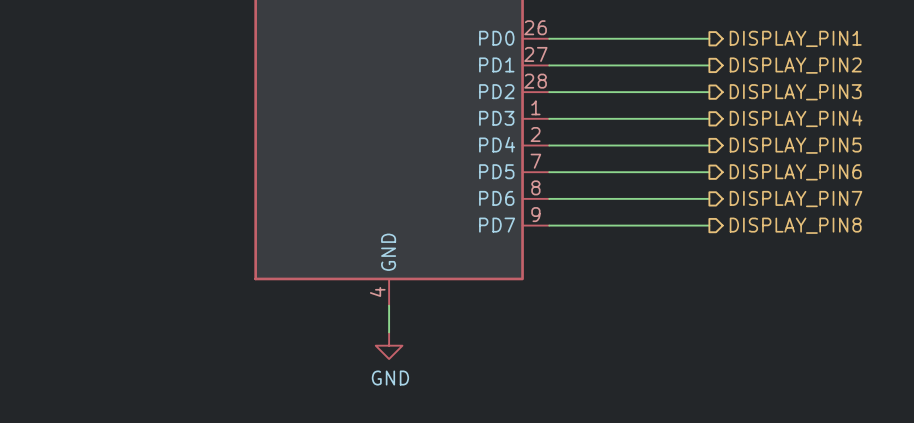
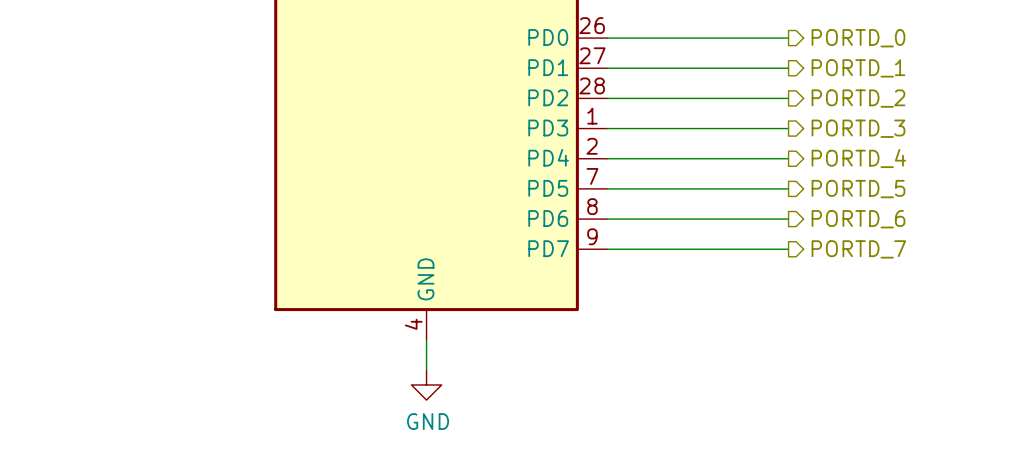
hierarchical label: DISPLAY_PIN1 (795, 38) -> PORTD_0 (858, 38)
hierarchical label: DISPLAY_PIN2 (795, 65) -> PORTD_1 (858, 68)
hierarchical label: DISPLAY_PIN3 (795, 92) -> PORTD_2 (858, 98)
hierarchical label: DISPLAY_PIN4 (796, 118) -> PORTD_3 (858, 128)
hierarchical label: DISPLAY_PIN5 (795, 145) -> PORTD_4 (858, 158)
hierarchical label: DISPLAY_PIN6 (795, 172) -> PORTD_5 (858, 189)
hierarchical label: DISPLAY_PIN7 (796, 199) -> PORTD_6 (858, 219)
hierarchical label: DISPLAY_PIN8 (795, 225) -> PORTD_7 (858, 249)

